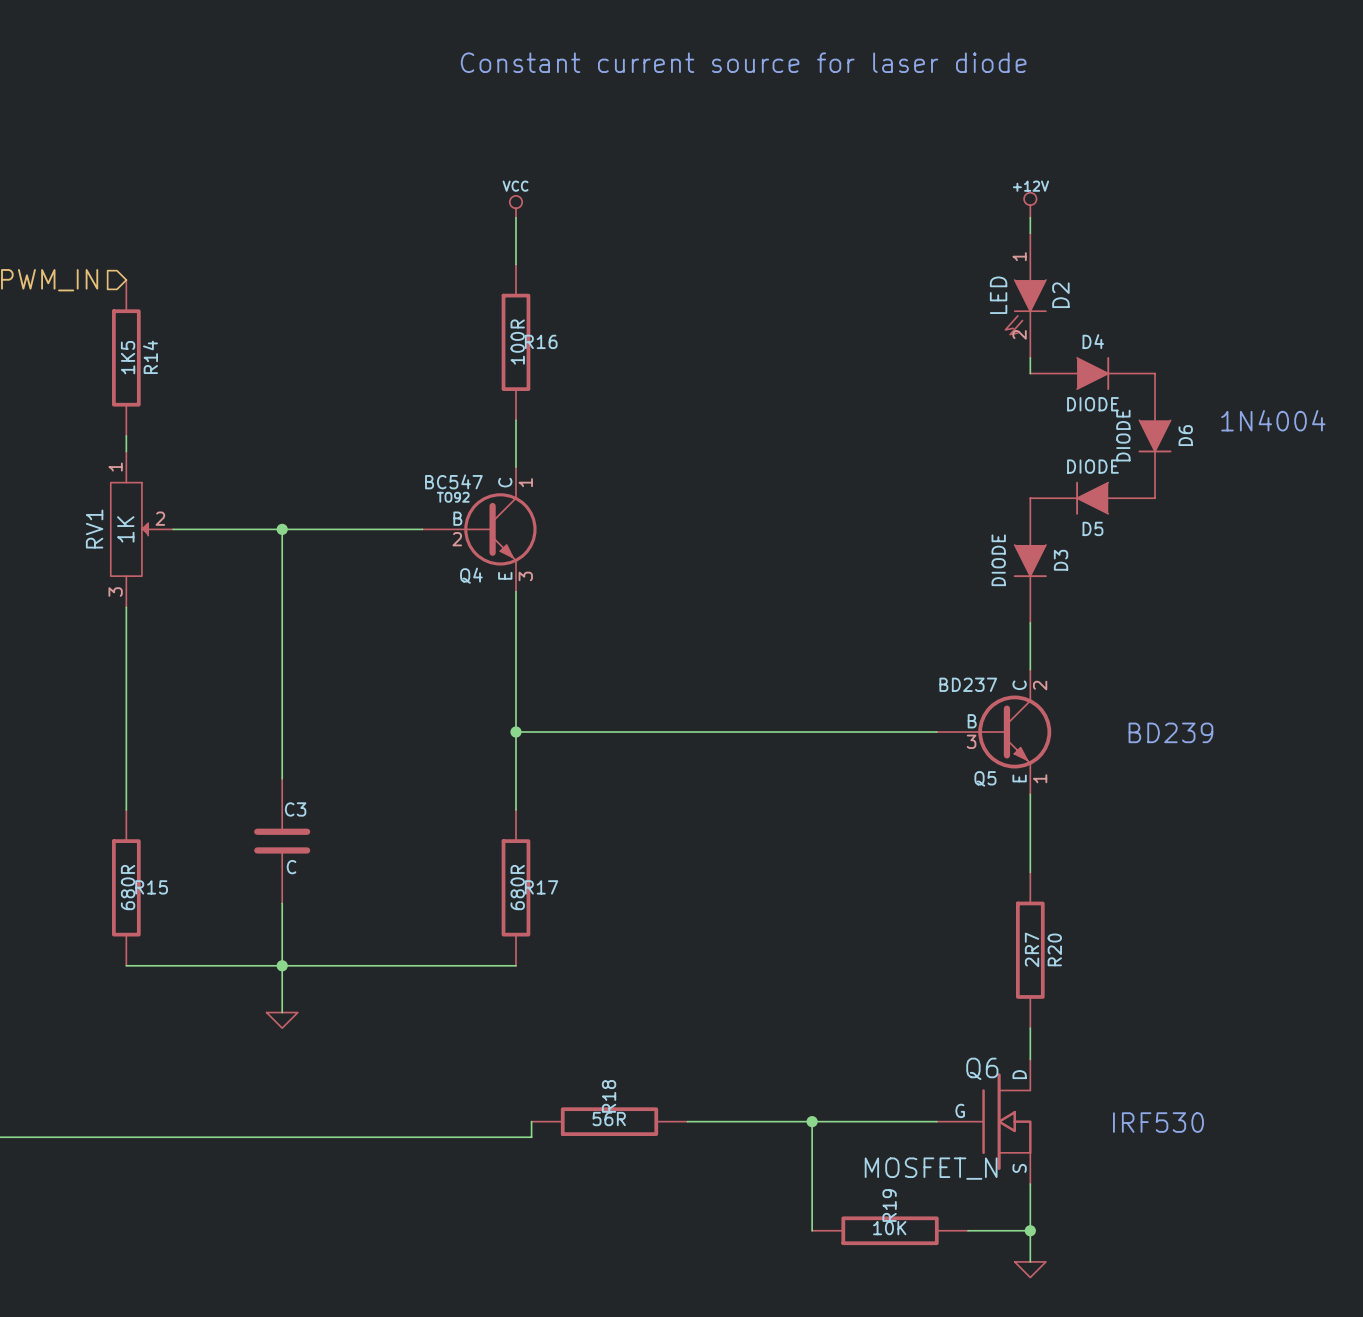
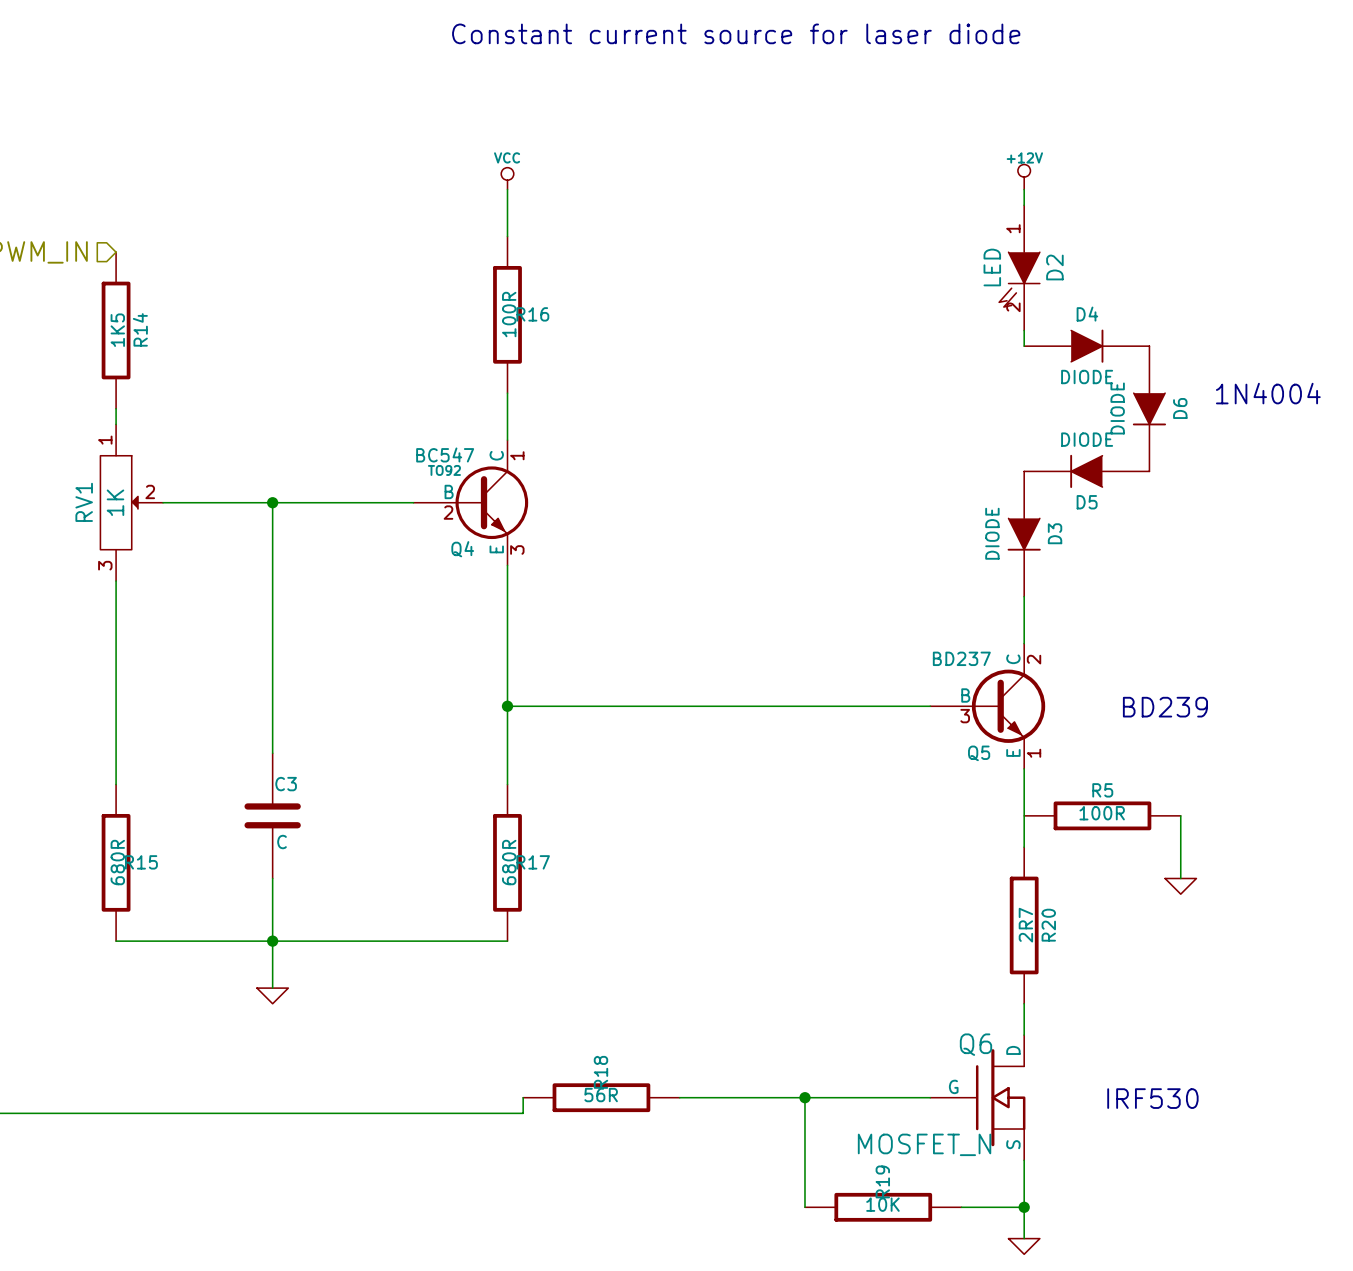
R5: none -> 100R (1102, 815)
wire: none -> (1180, 815) (1180, 878)
power symbol: none -> (1180, 886)

